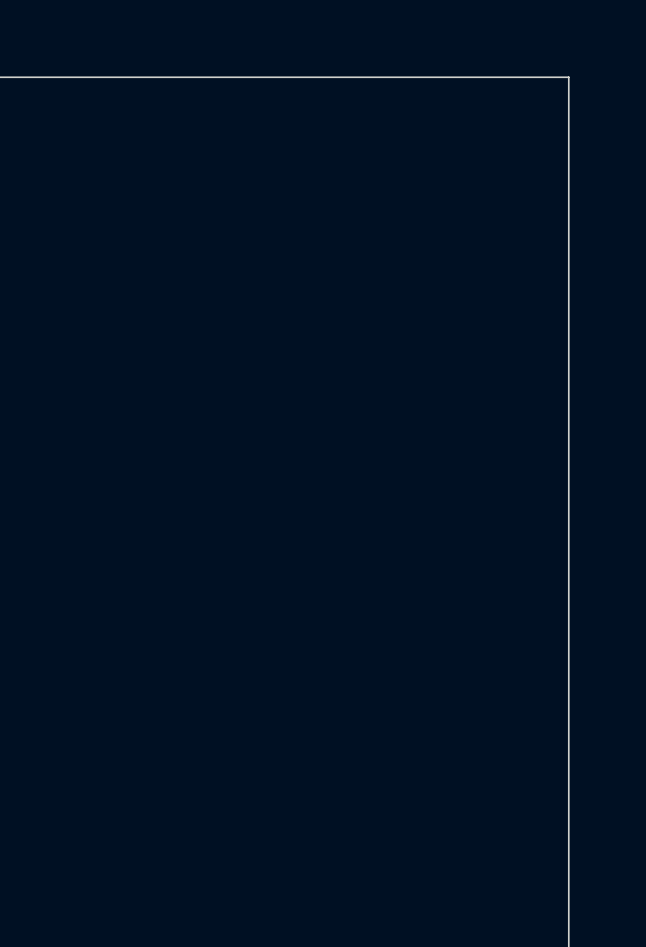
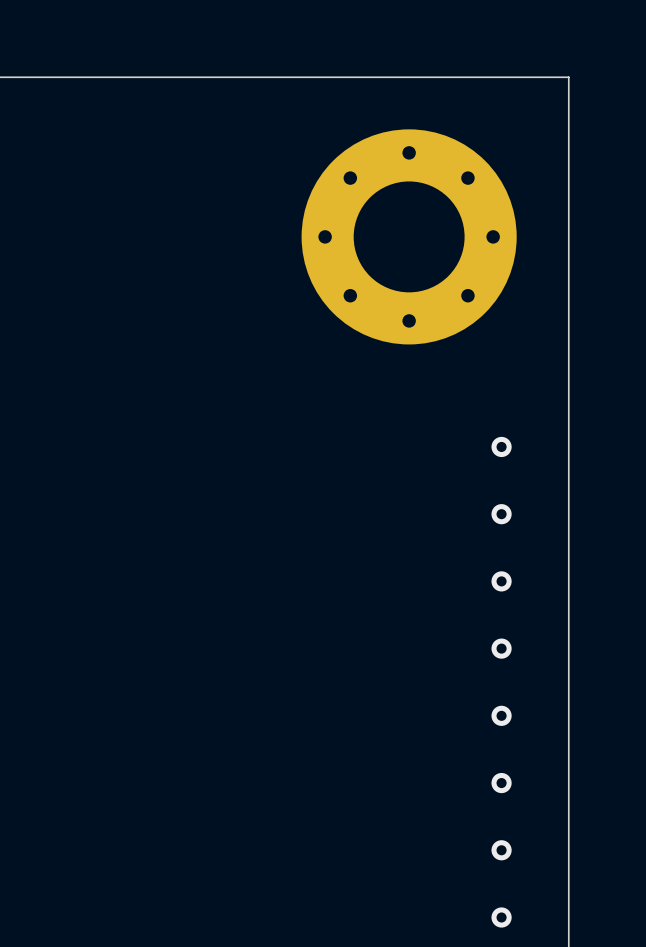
part: none -> (409, 236)
via: none -> (501, 446)
via: none -> (501, 514)
via: none -> (501, 581)
via: none -> (501, 648)
via: none -> (501, 715)
via: none -> (501, 783)
via: none -> (501, 850)
via: none -> (501, 917)

